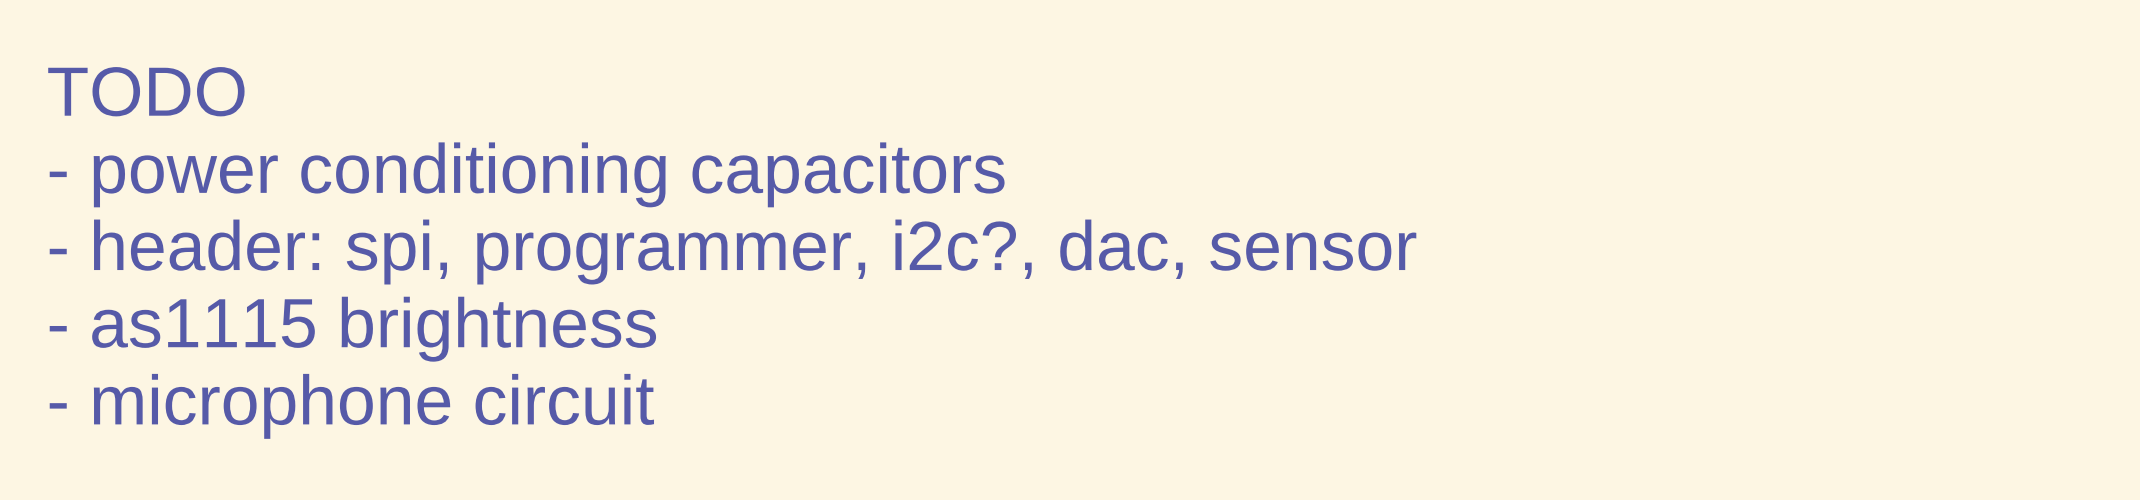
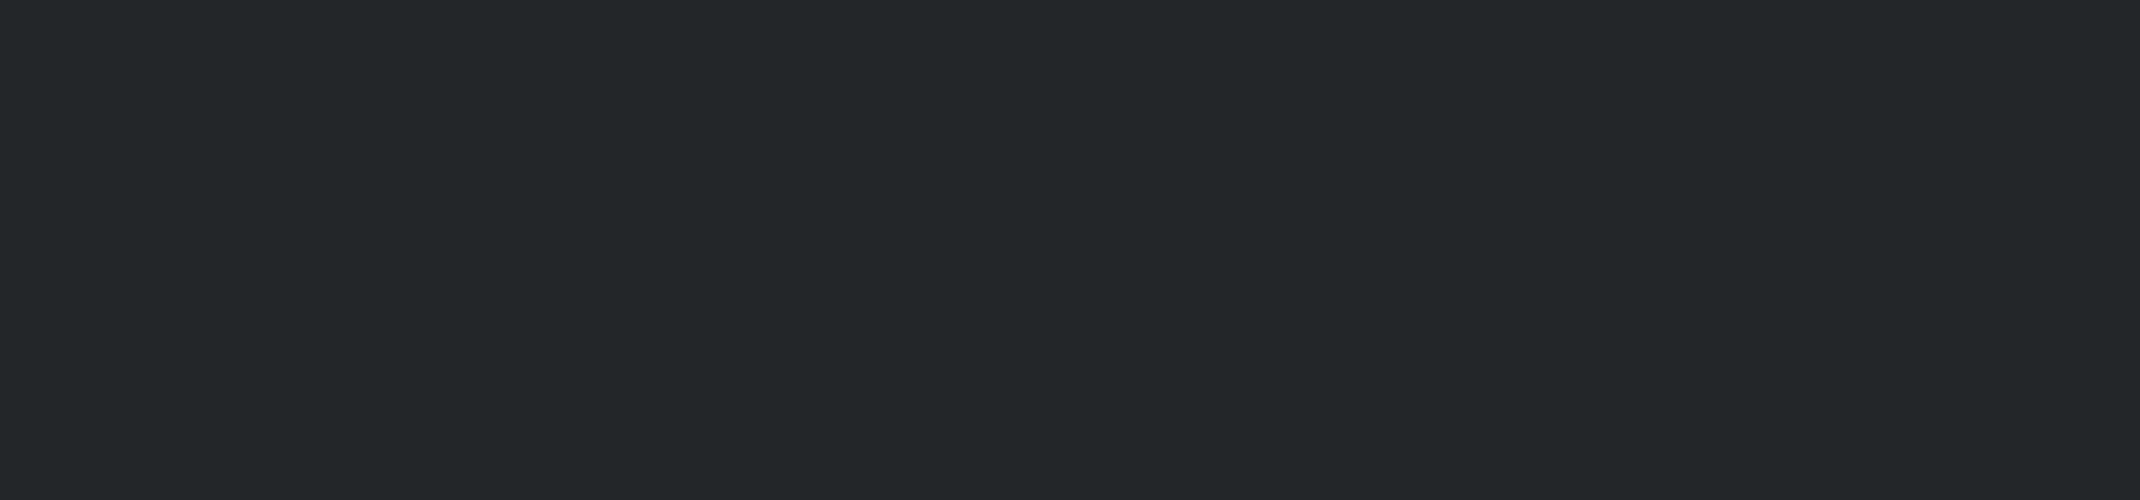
text: TODO (146, 91) -> none
text: - power conditioning capacitors (527, 174) -> none
text: - header: spi, programmer, i2c?, dac, sensor (733, 252) -> none
text: - as1115 brightness (352, 329) -> none
text: - microphone circuit (351, 406) -> none

